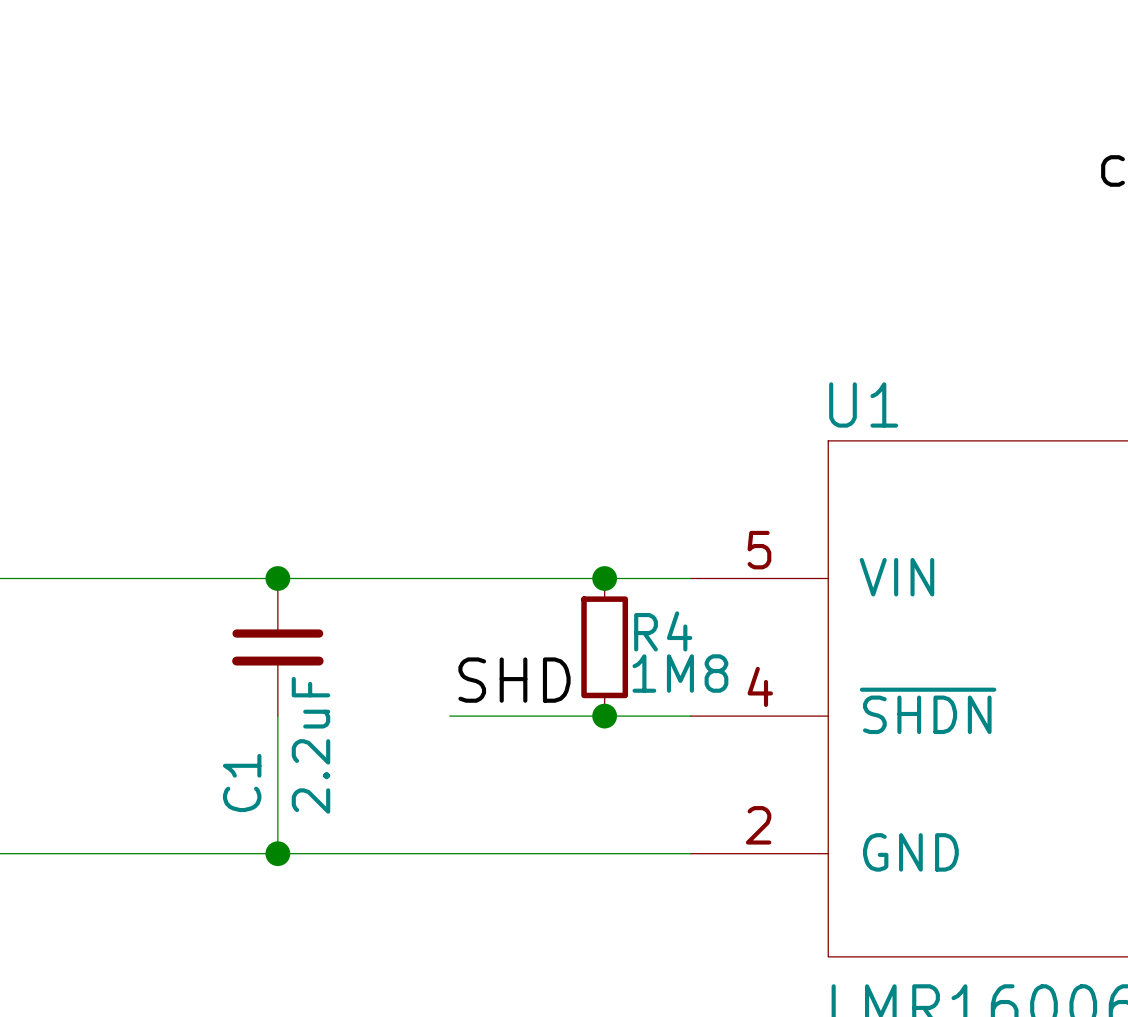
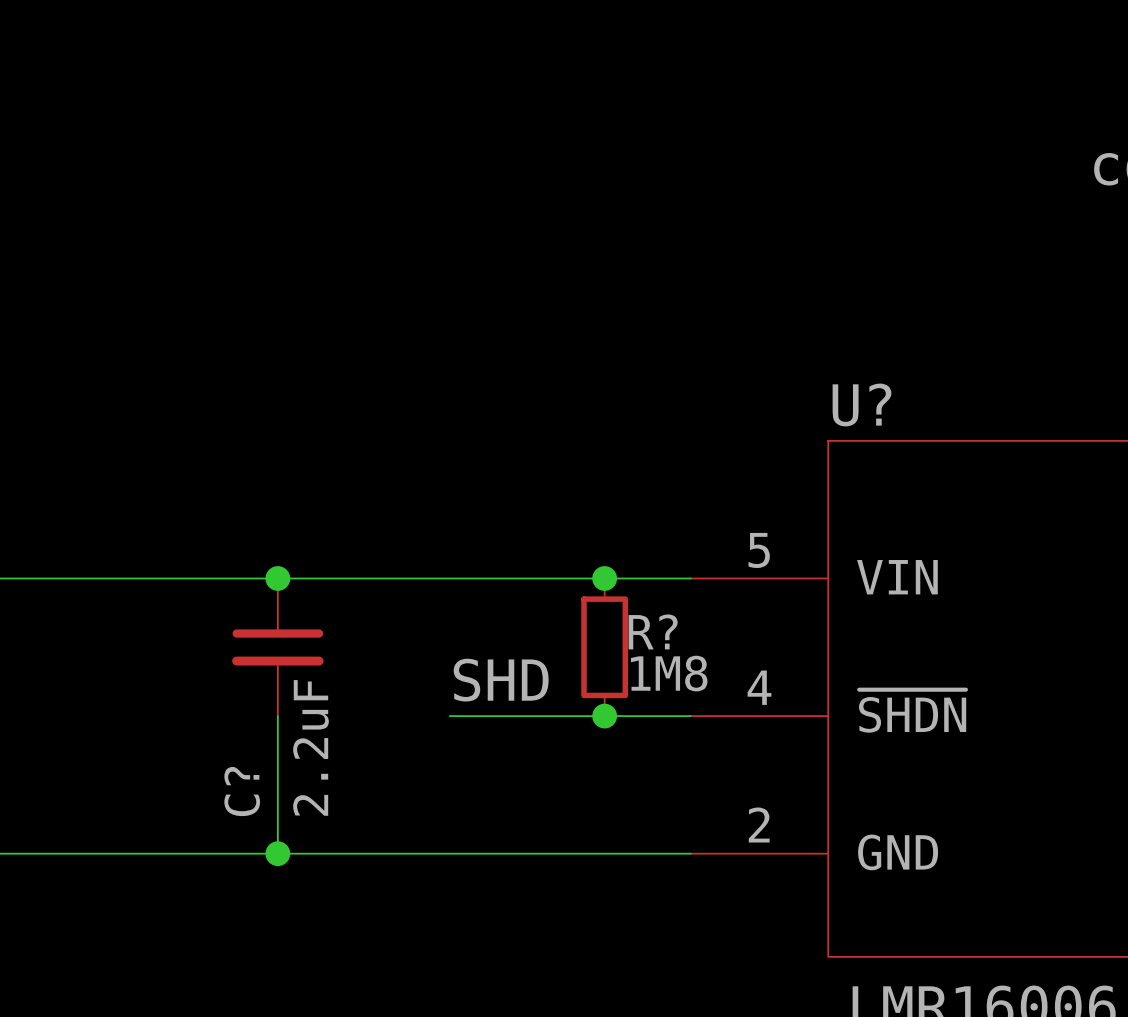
U1 name: U1 (863, 404) -> U? (862, 404)
R4 name: R4 (663, 631) -> R? (653, 631)
C1 name: C1 (242, 782) -> C? (242, 791)

